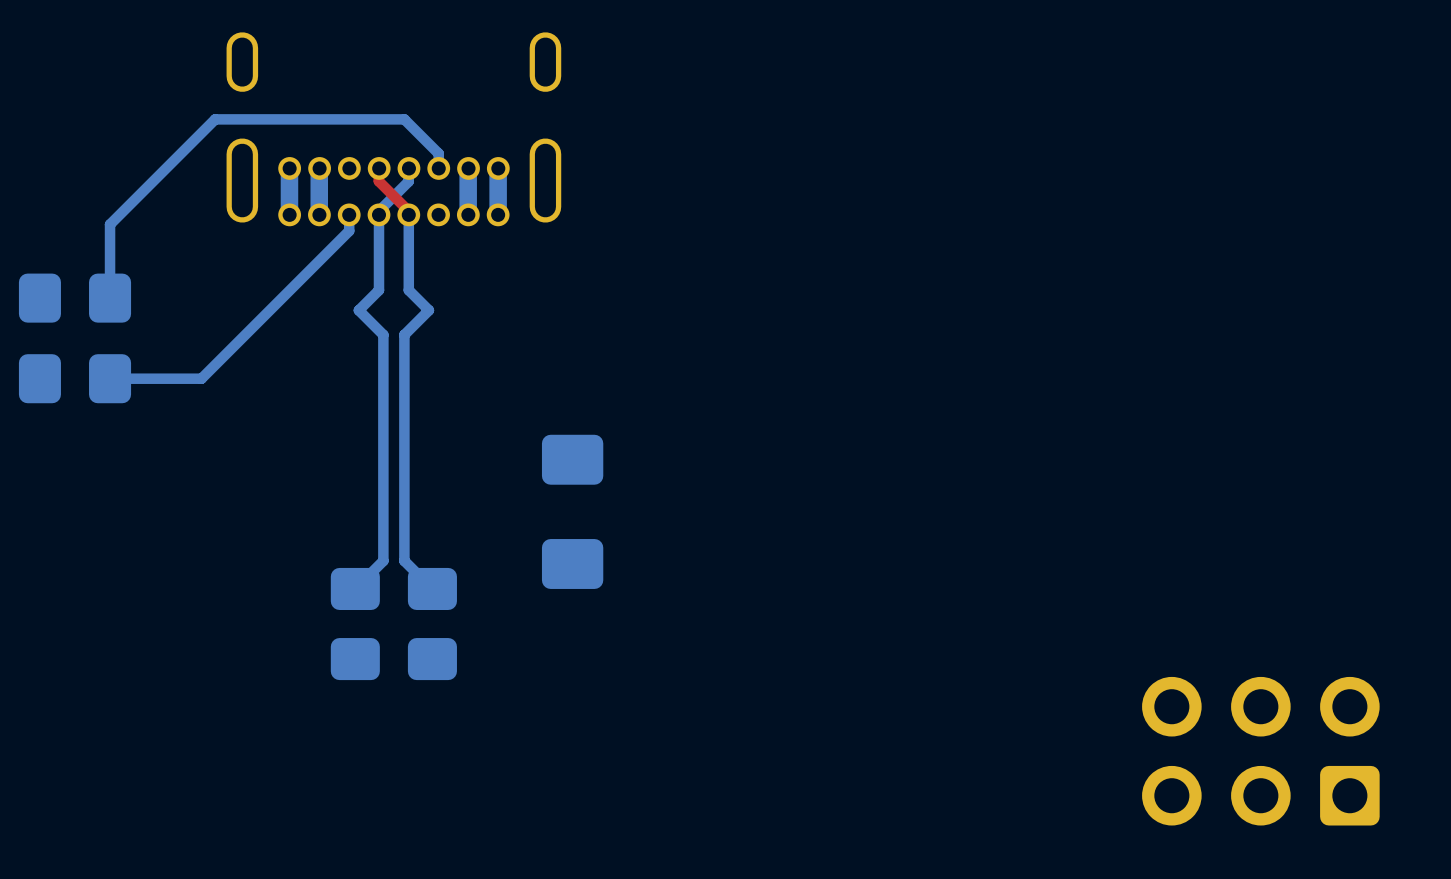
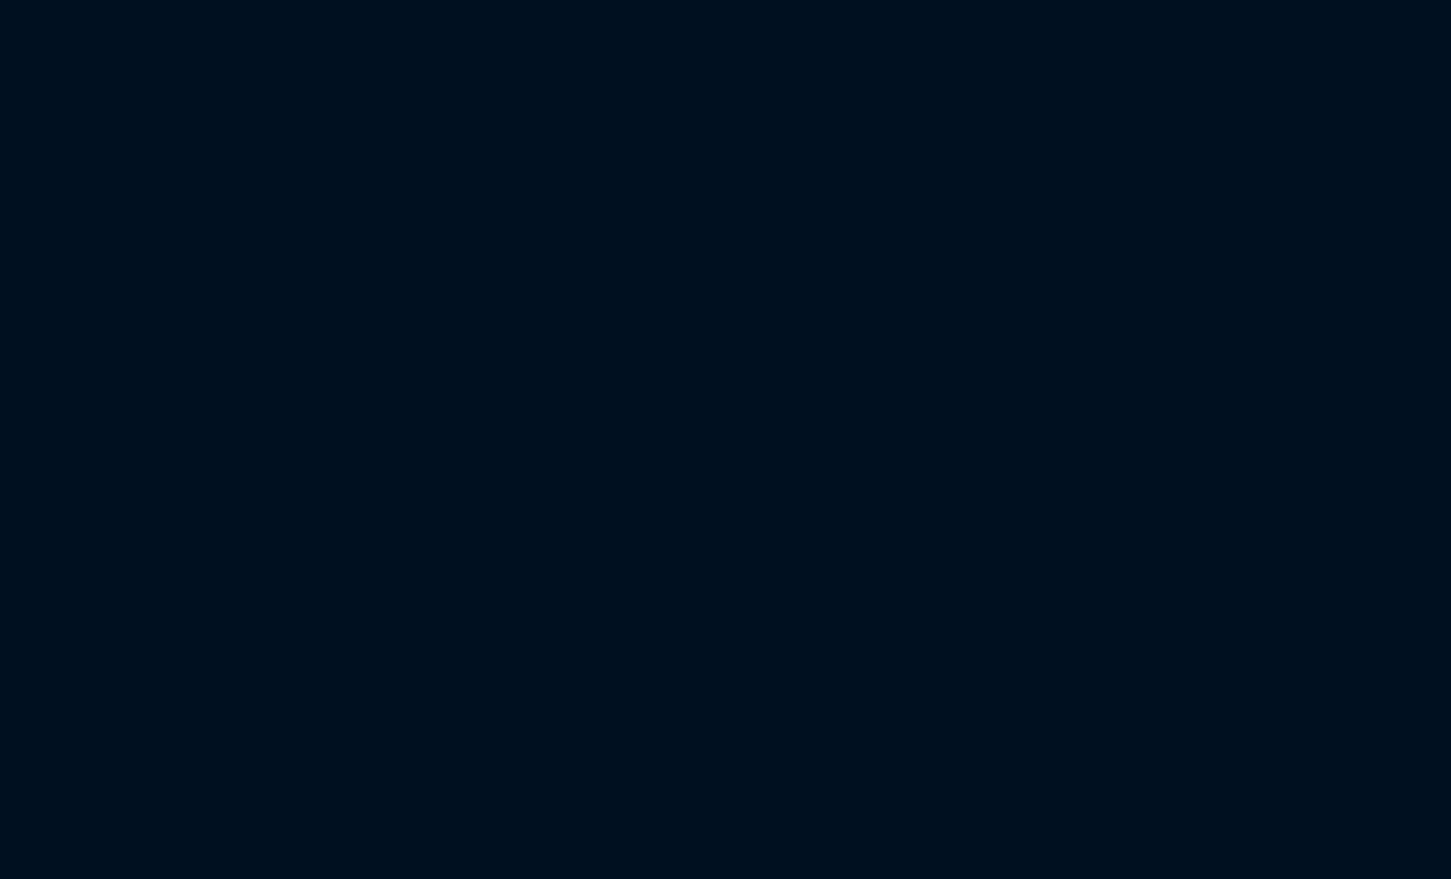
part: (393, 129) -> none
bottom track: (289, 168) (289, 214) -> none
bottom track: (319, 168) (319, 214) -> none
top track: (378, 168) (378, 181) (408, 211) (408, 214) -> none
bottom track: (408, 168) (408, 181) (378, 211) (378, 290) (358, 310) (383, 334) (383, 560) (355, 588) -> none
bottom track: (438, 168) (438, 153) (404, 119) (215, 119) (110, 224) (110, 298) -> none
bottom track: (468, 168) (468, 214) -> none
bottom track: (498, 168) (498, 214) -> none
bottom track: (349, 214) (349, 230) (201, 378) (110, 378) -> none
bottom track: (408, 214) (408, 290) (428, 310) (404, 334) (404, 560) (432, 588) -> none
part: (74, 298) -> none
part: (74, 378) -> none
part: (572, 511) -> none
part: (355, 624) -> none
part: (432, 624) -> none
part: (1260, 751) -> none

